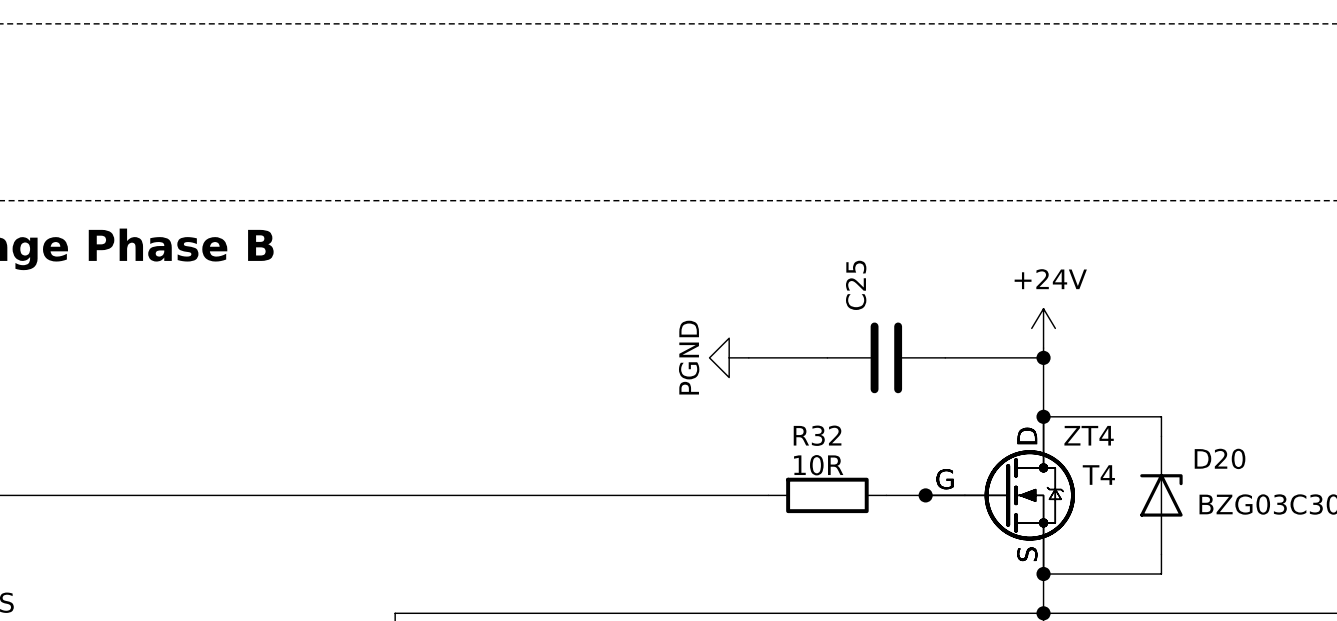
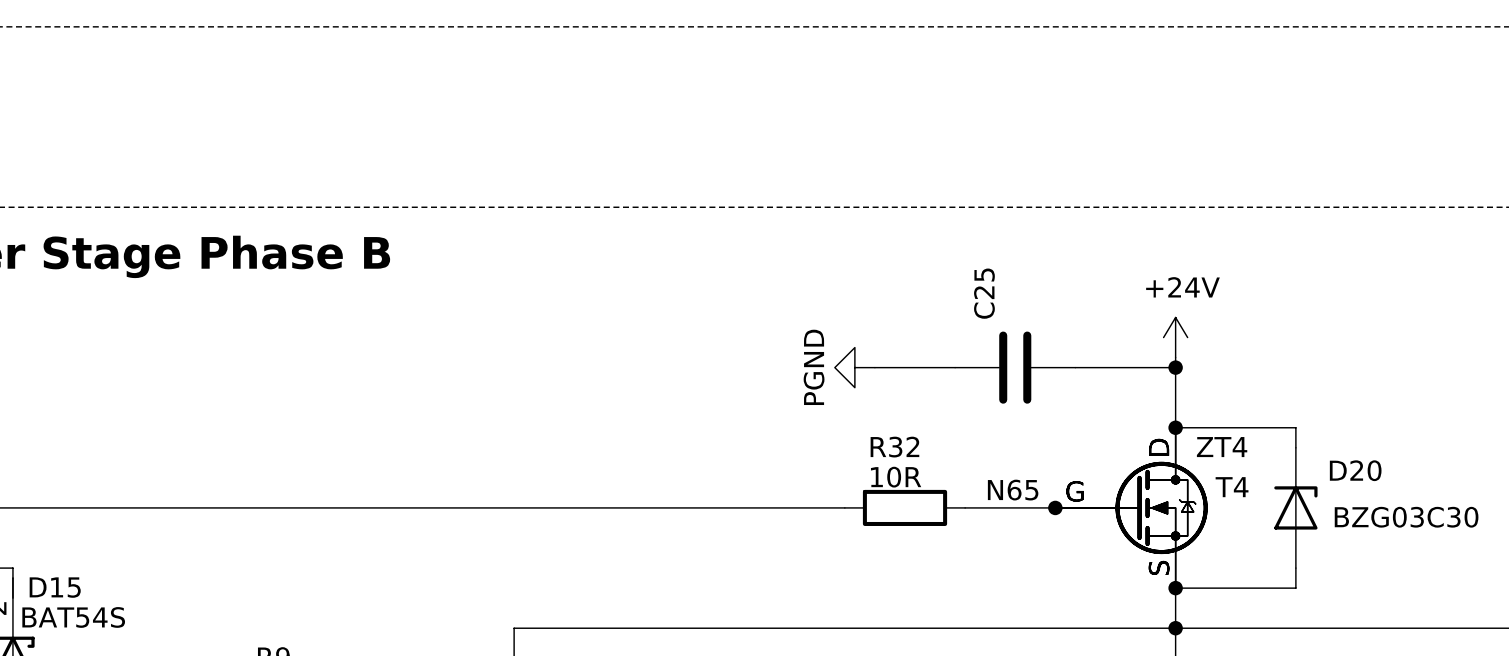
label: none -> N65 (1013, 490)
wire: (719, 495) (768, 495) -> (965, 507) (1015, 507)
R32 position: (827, 495) -> (905, 507)

